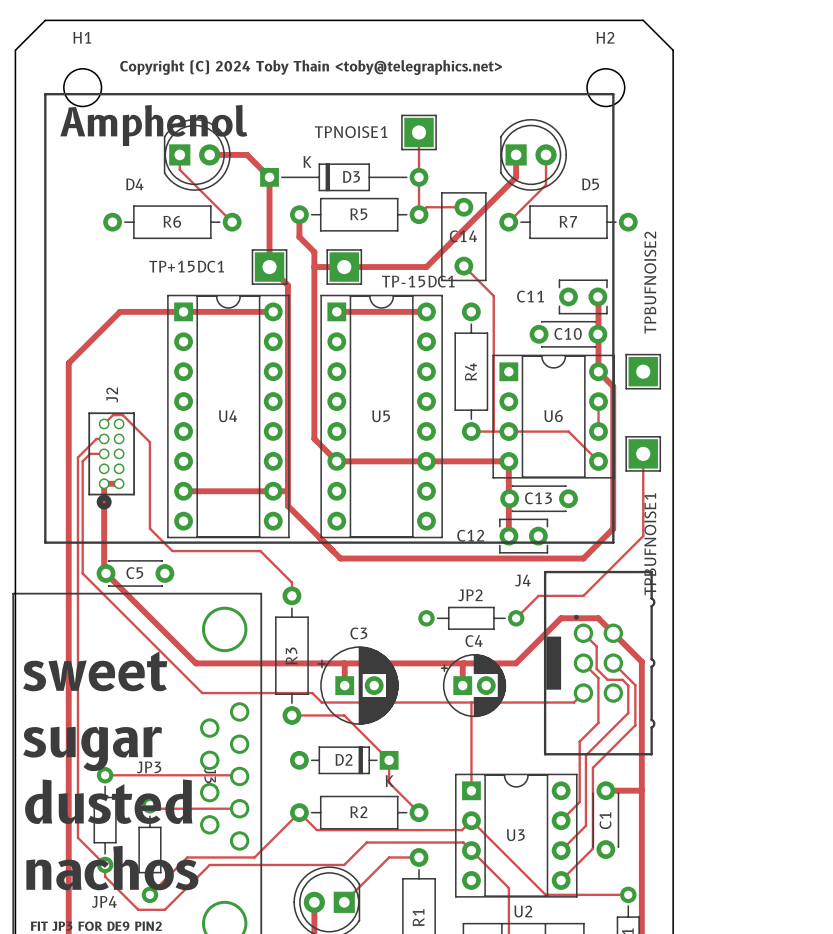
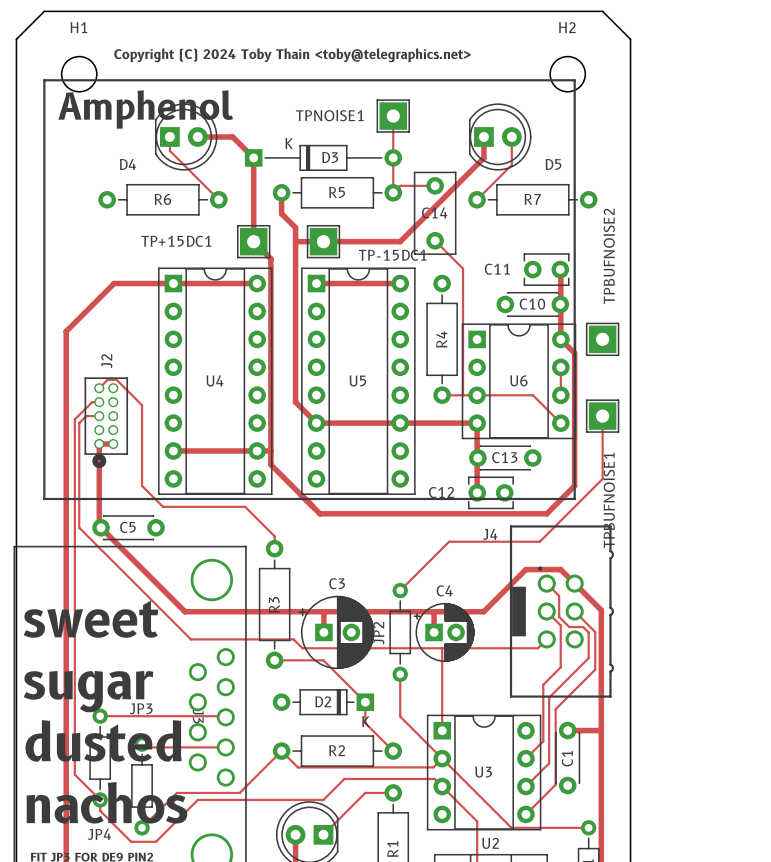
track: (643, 521) (643, 536) (583, 595) (538, 595) (516, 618) -> (602, 478) (539, 541) (449, 541) (400, 590)
JP2 name position: JP2 (470, 595) -> JP2 (378, 633)
JP2 rotation: 0° (471, 618) -> 90° clockwise (400, 632)
JP2 position: (471, 618) -> (400, 632)
track: none -> (400, 674) (400, 716) (442, 758)

